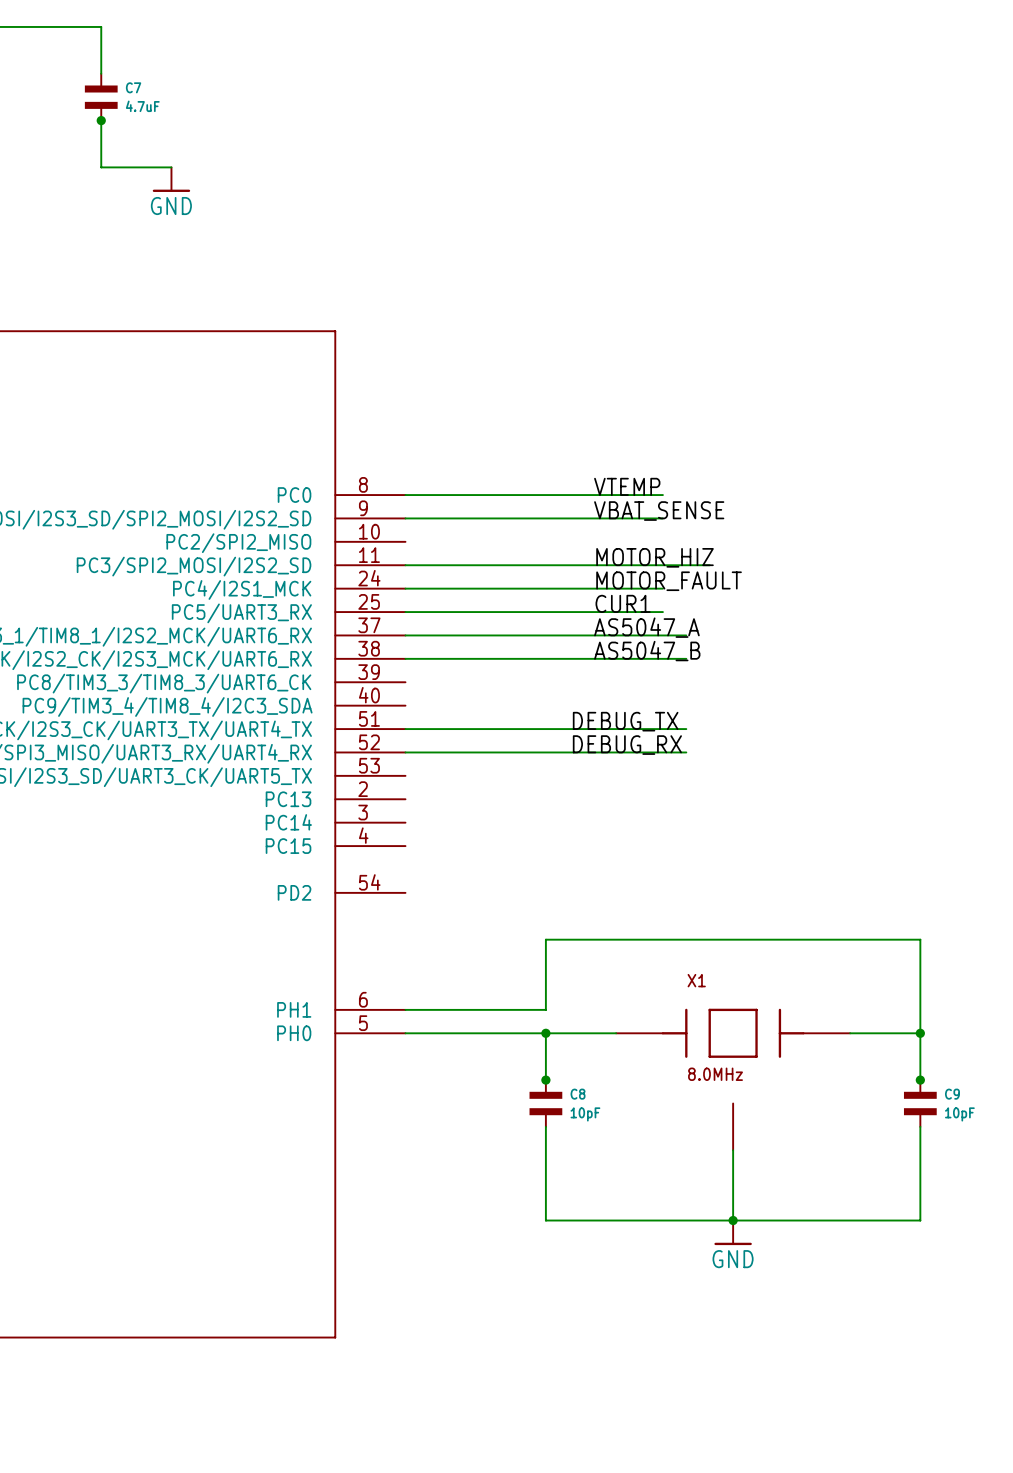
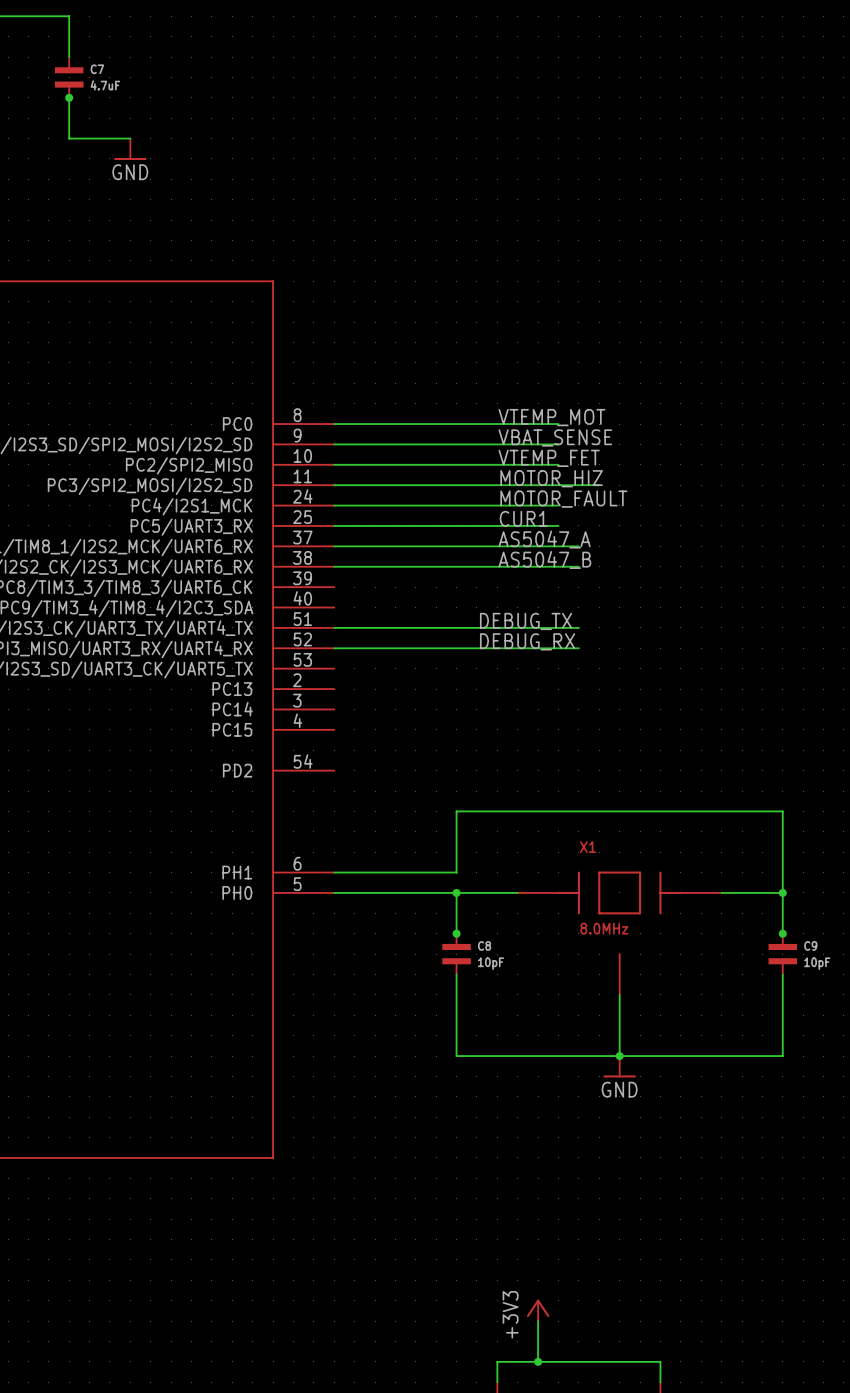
label: VTEMP (627, 486) -> VTEMP_MOT (551, 417)
label: none -> VTEMP_FET (549, 458)
wire: none -> (334, 464) (558, 464)

